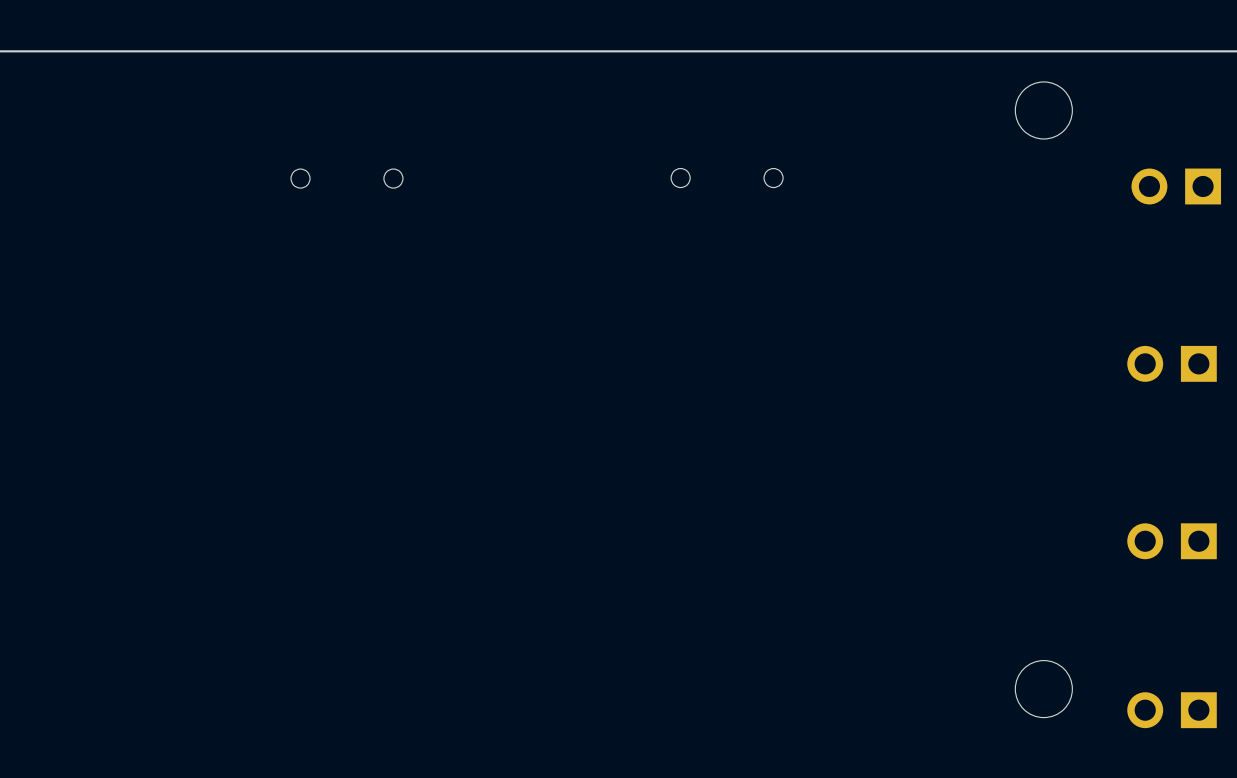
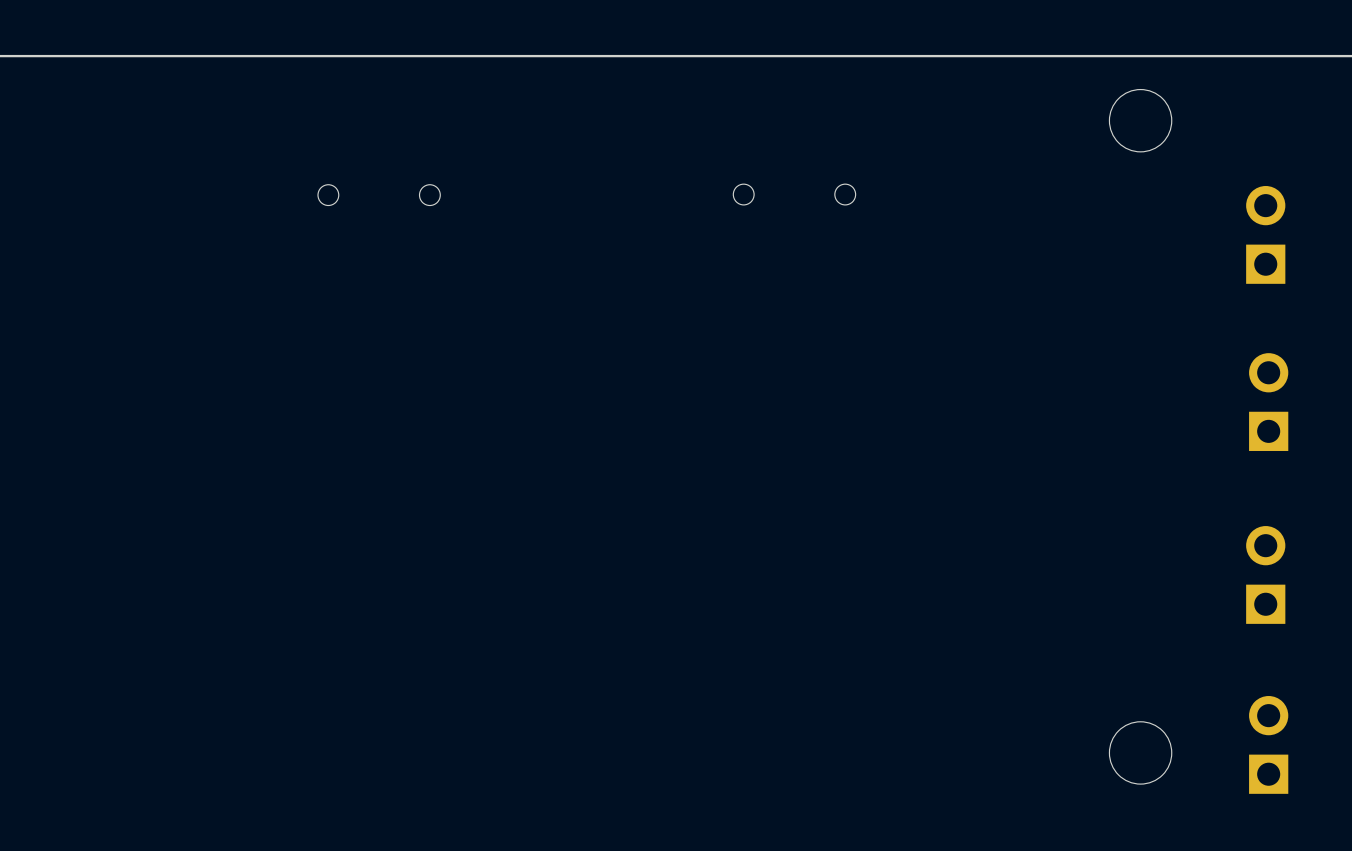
part rotation: 0° (1176, 186) -> 90° clockwise (1265, 234)
part rotation: 0° (1172, 363) -> 90° clockwise (1268, 402)
part rotation: 0° (1172, 541) -> 90° clockwise (1265, 574)
part rotation: 0° (1172, 710) -> 90° clockwise (1268, 744)

